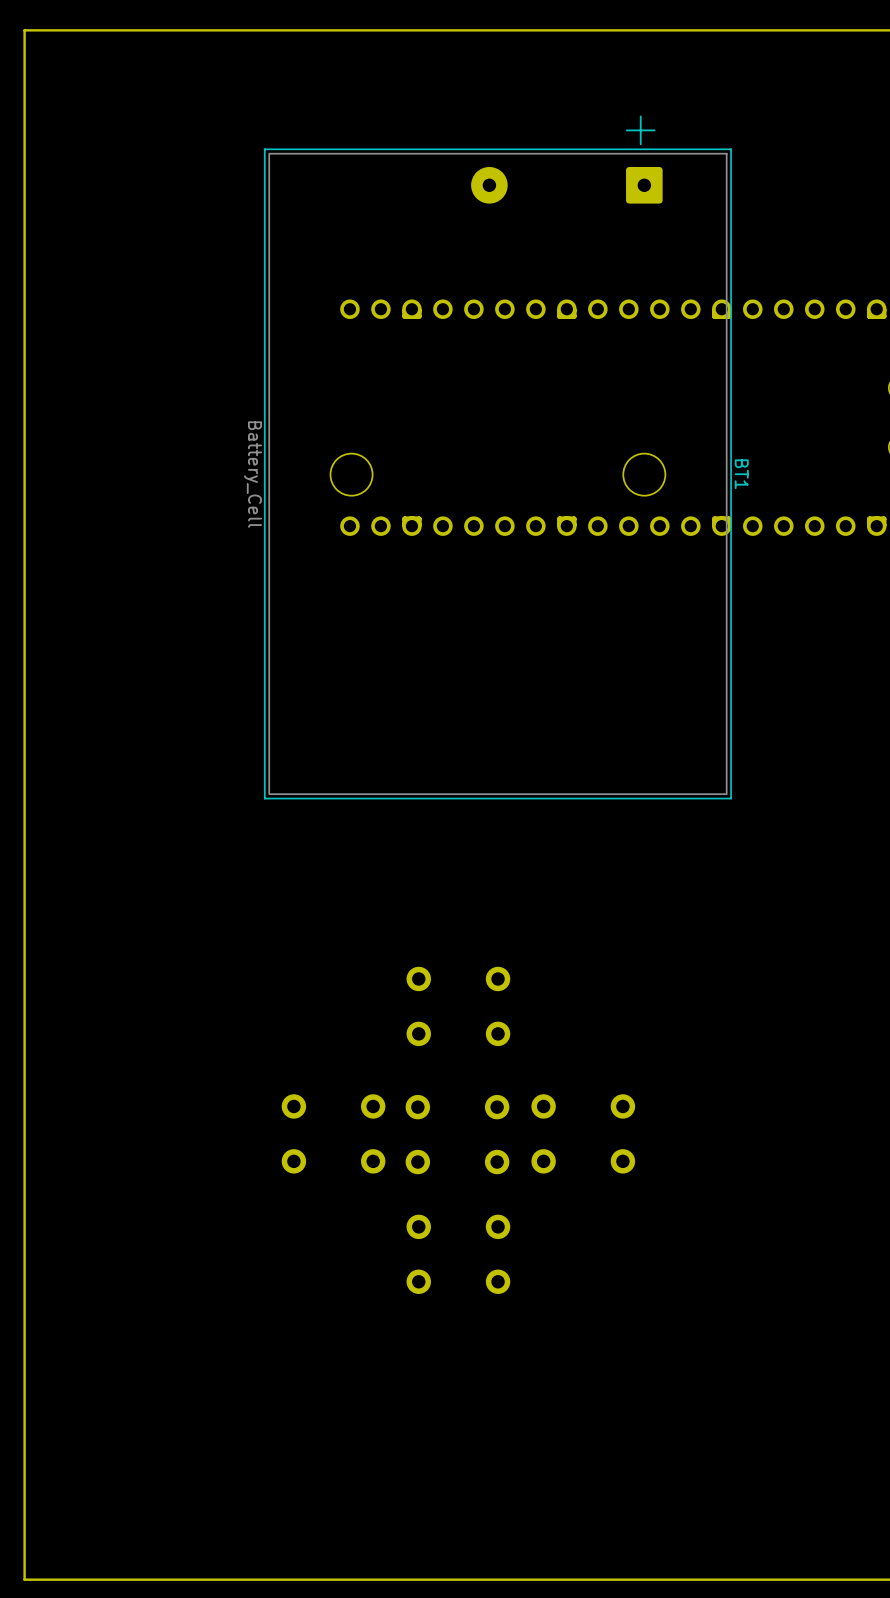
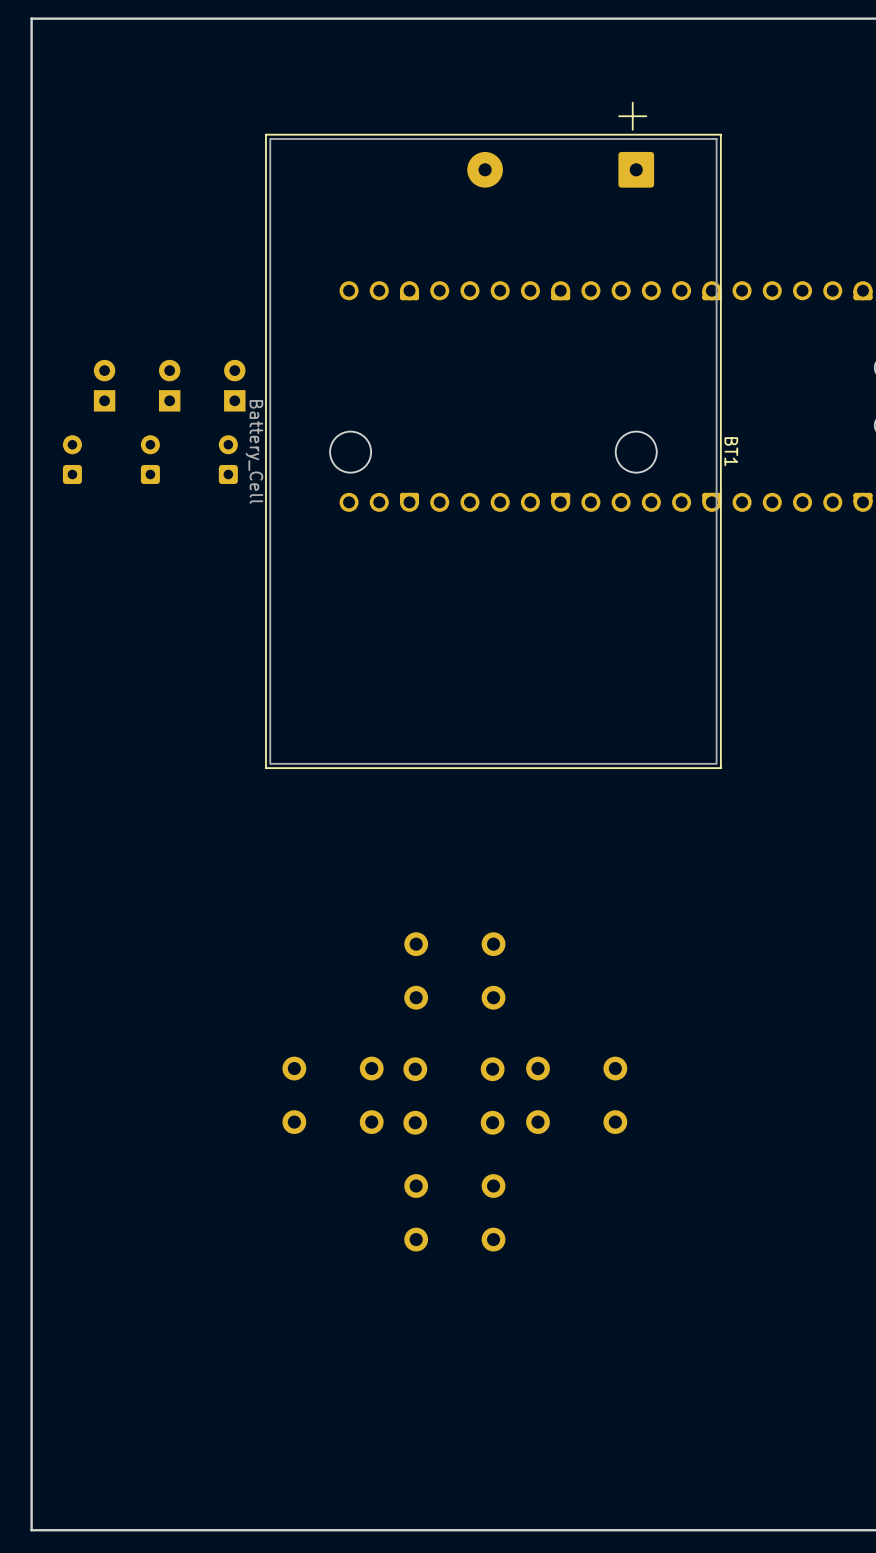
part: none -> (104, 385)
part: none -> (169, 385)
part: none -> (234, 385)
part: none -> (72, 459)
part: none -> (150, 459)
part: none -> (228, 459)

